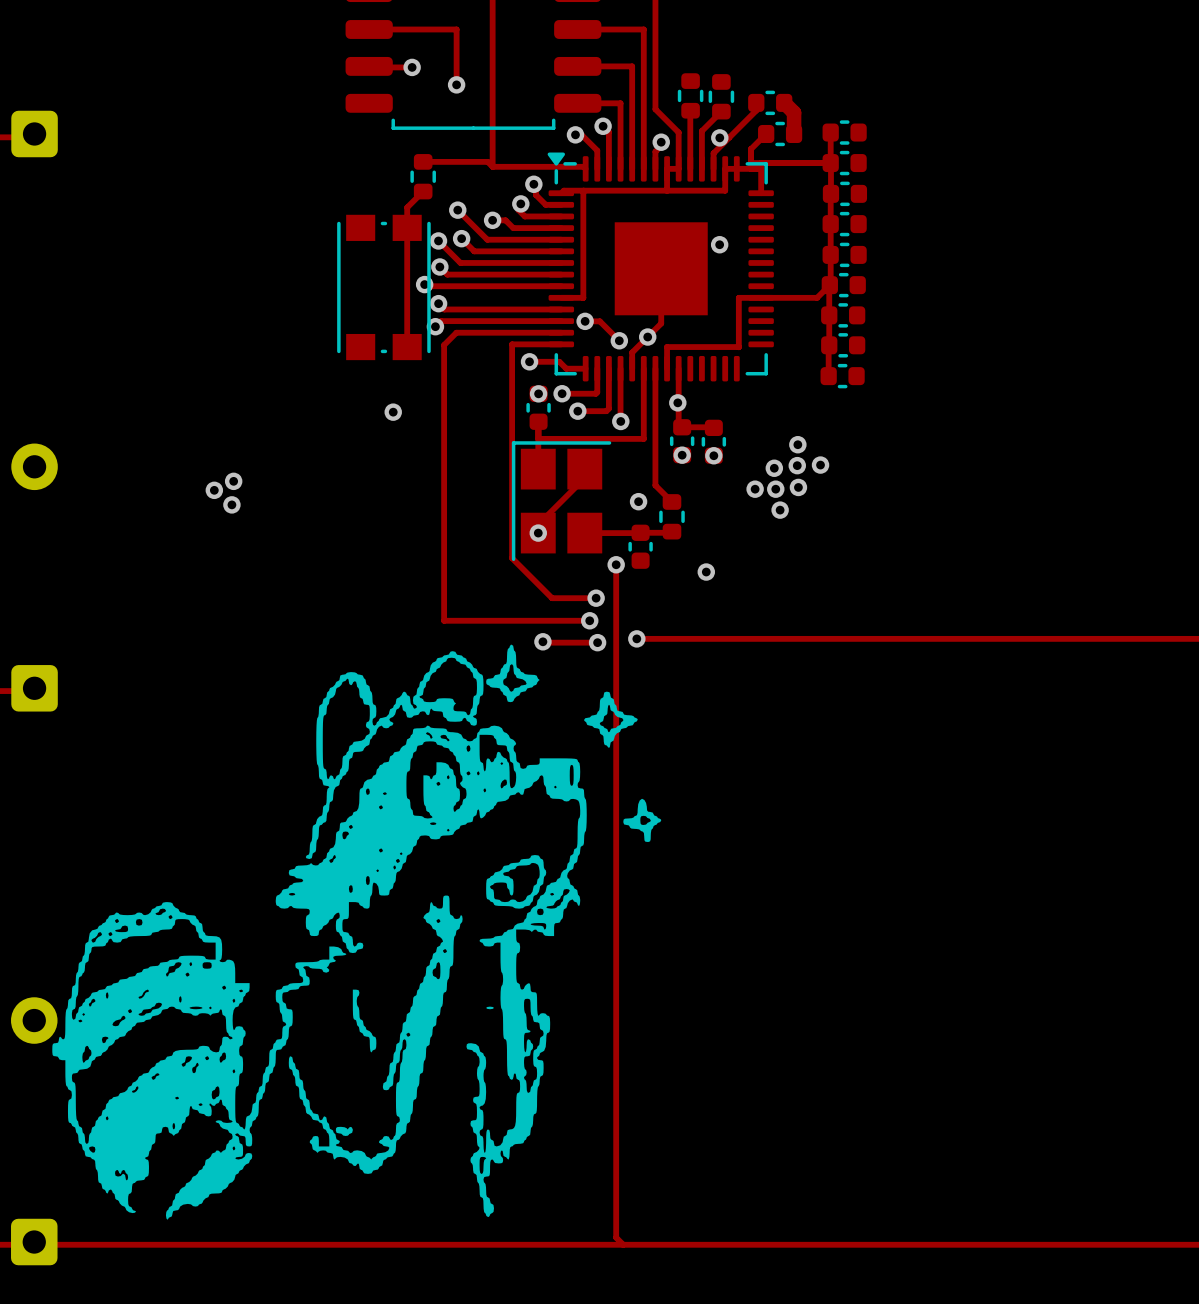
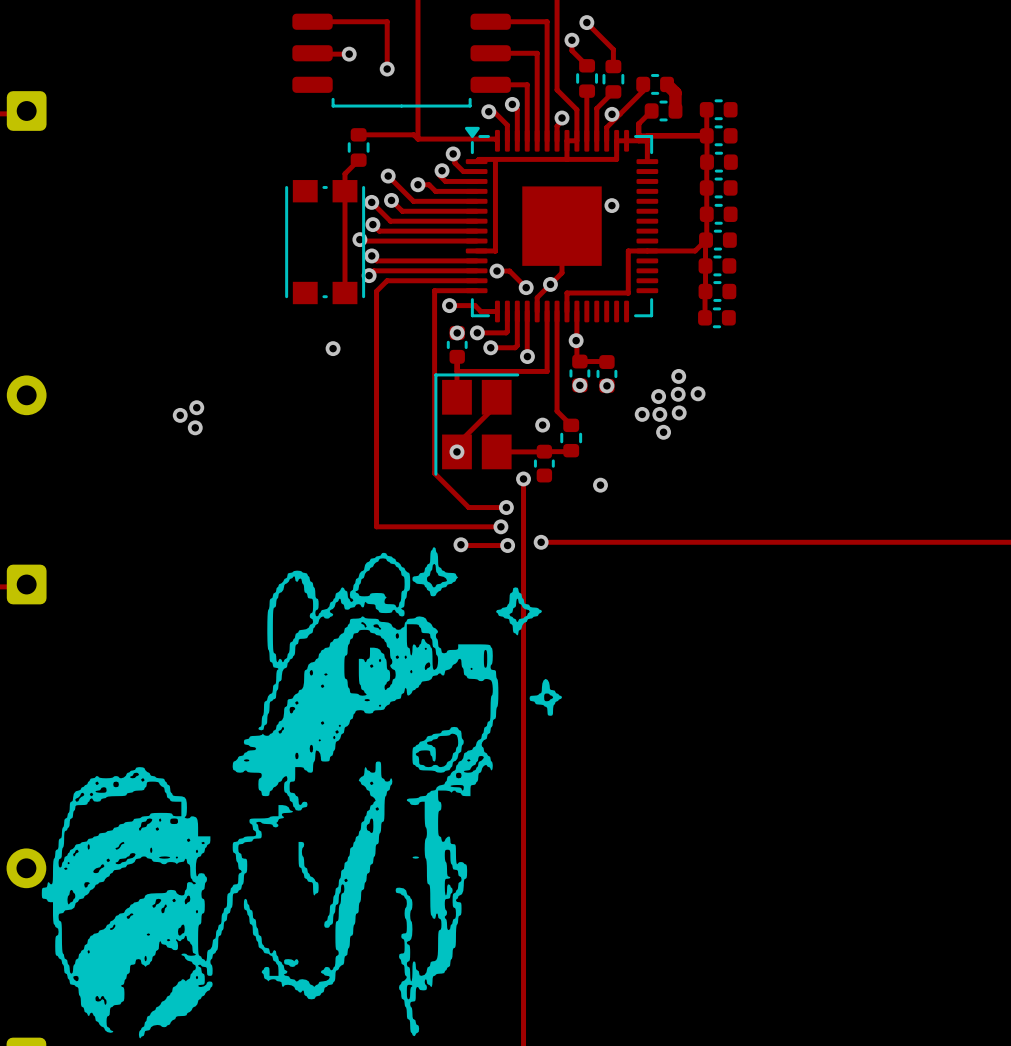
track: none -> (586, 22) (613, 49) (613, 66)
via: none -> (586, 22)
track: none -> (571, 40) (571, 50) (587, 65)
via: none -> (571, 40)

